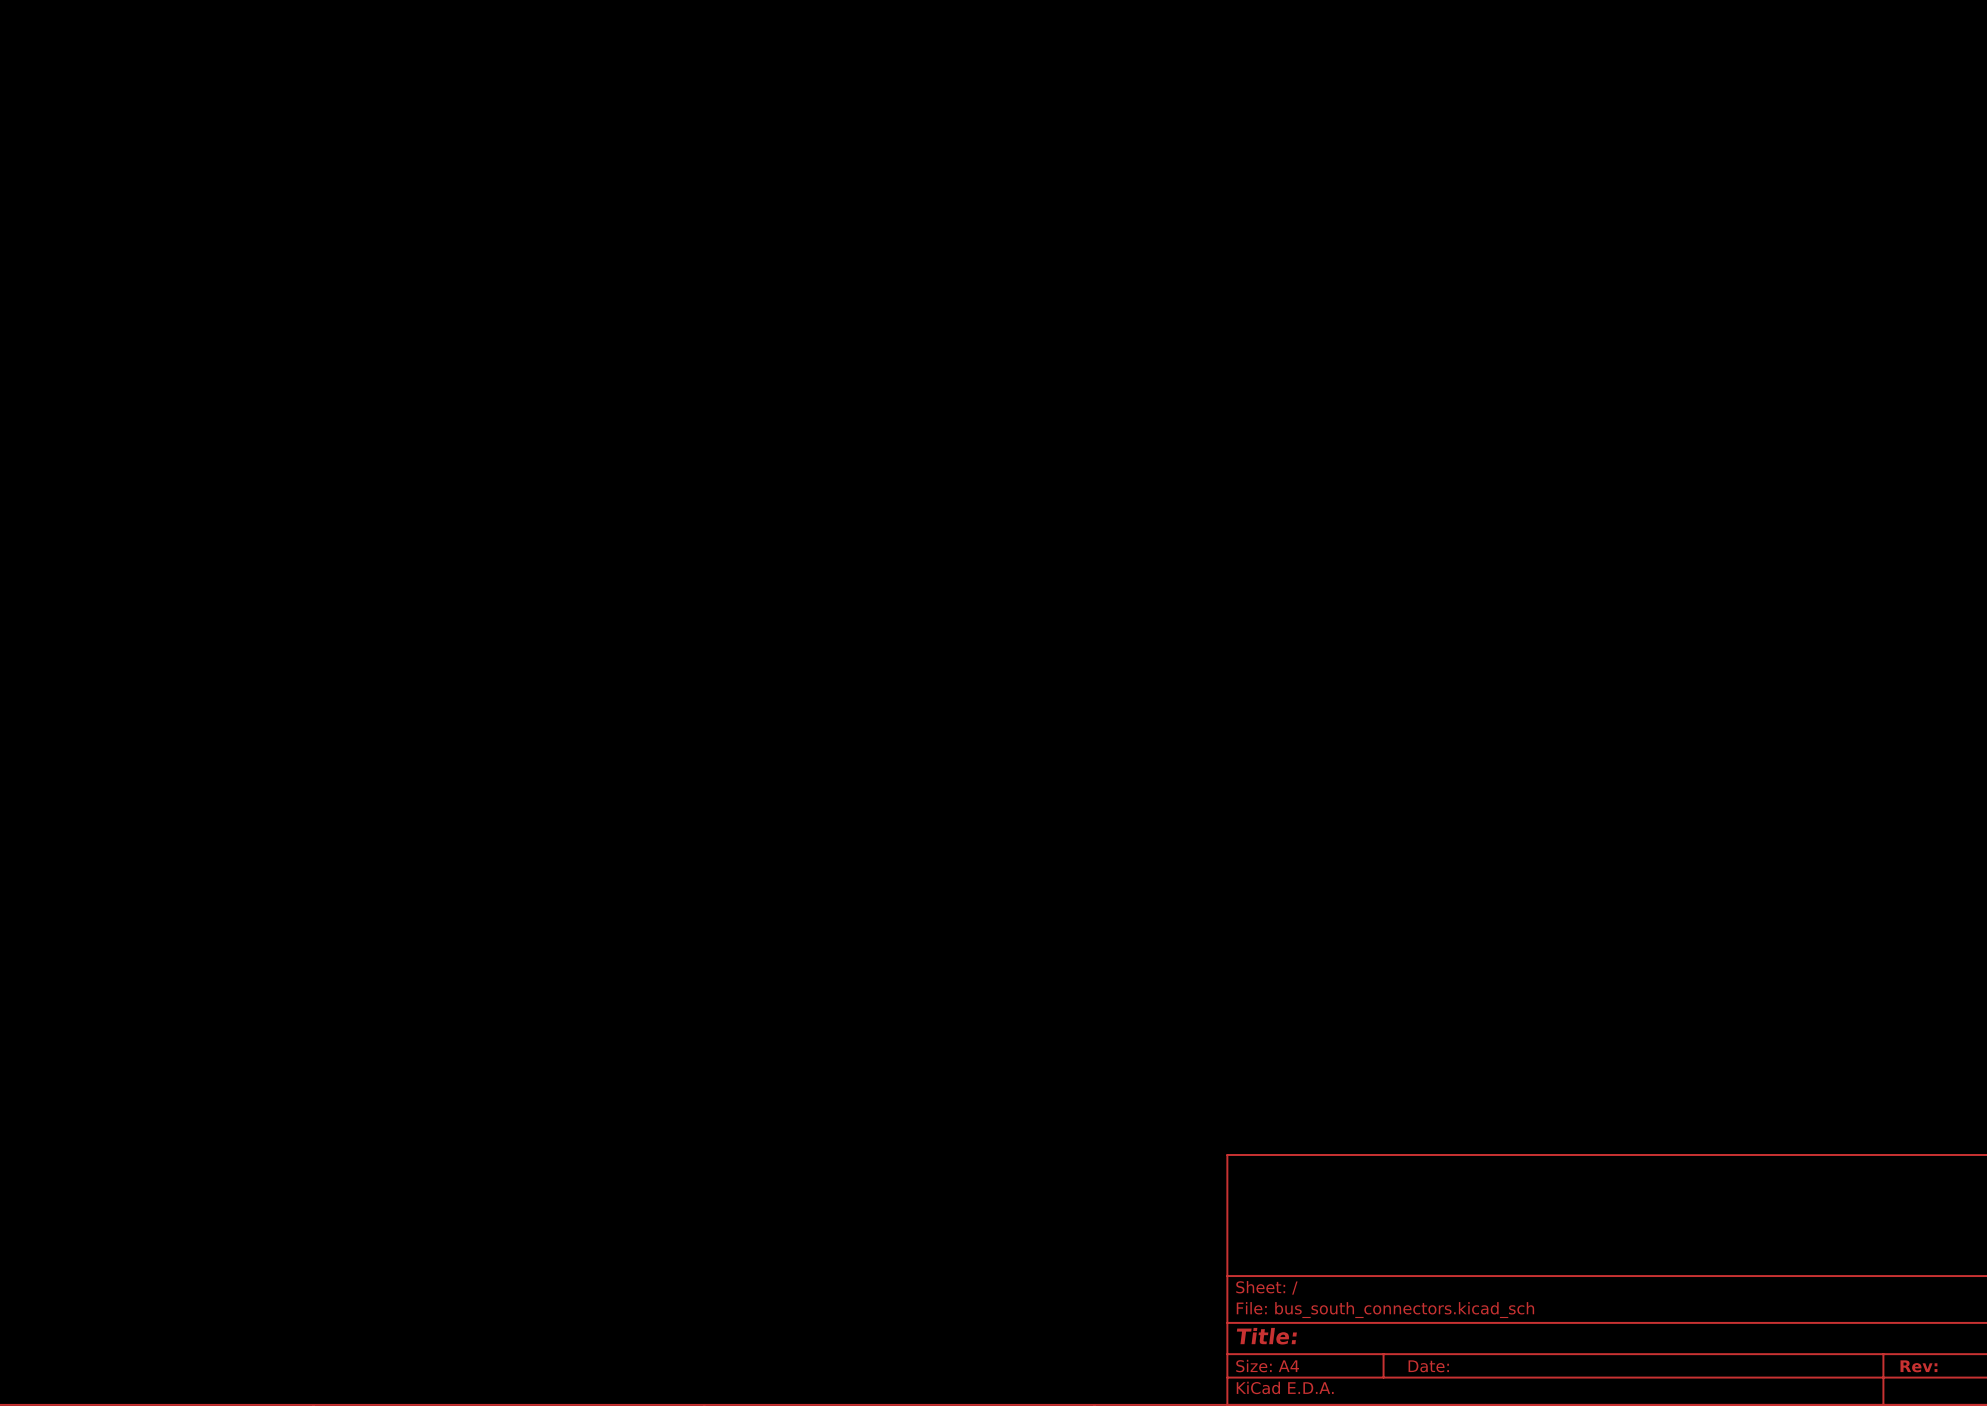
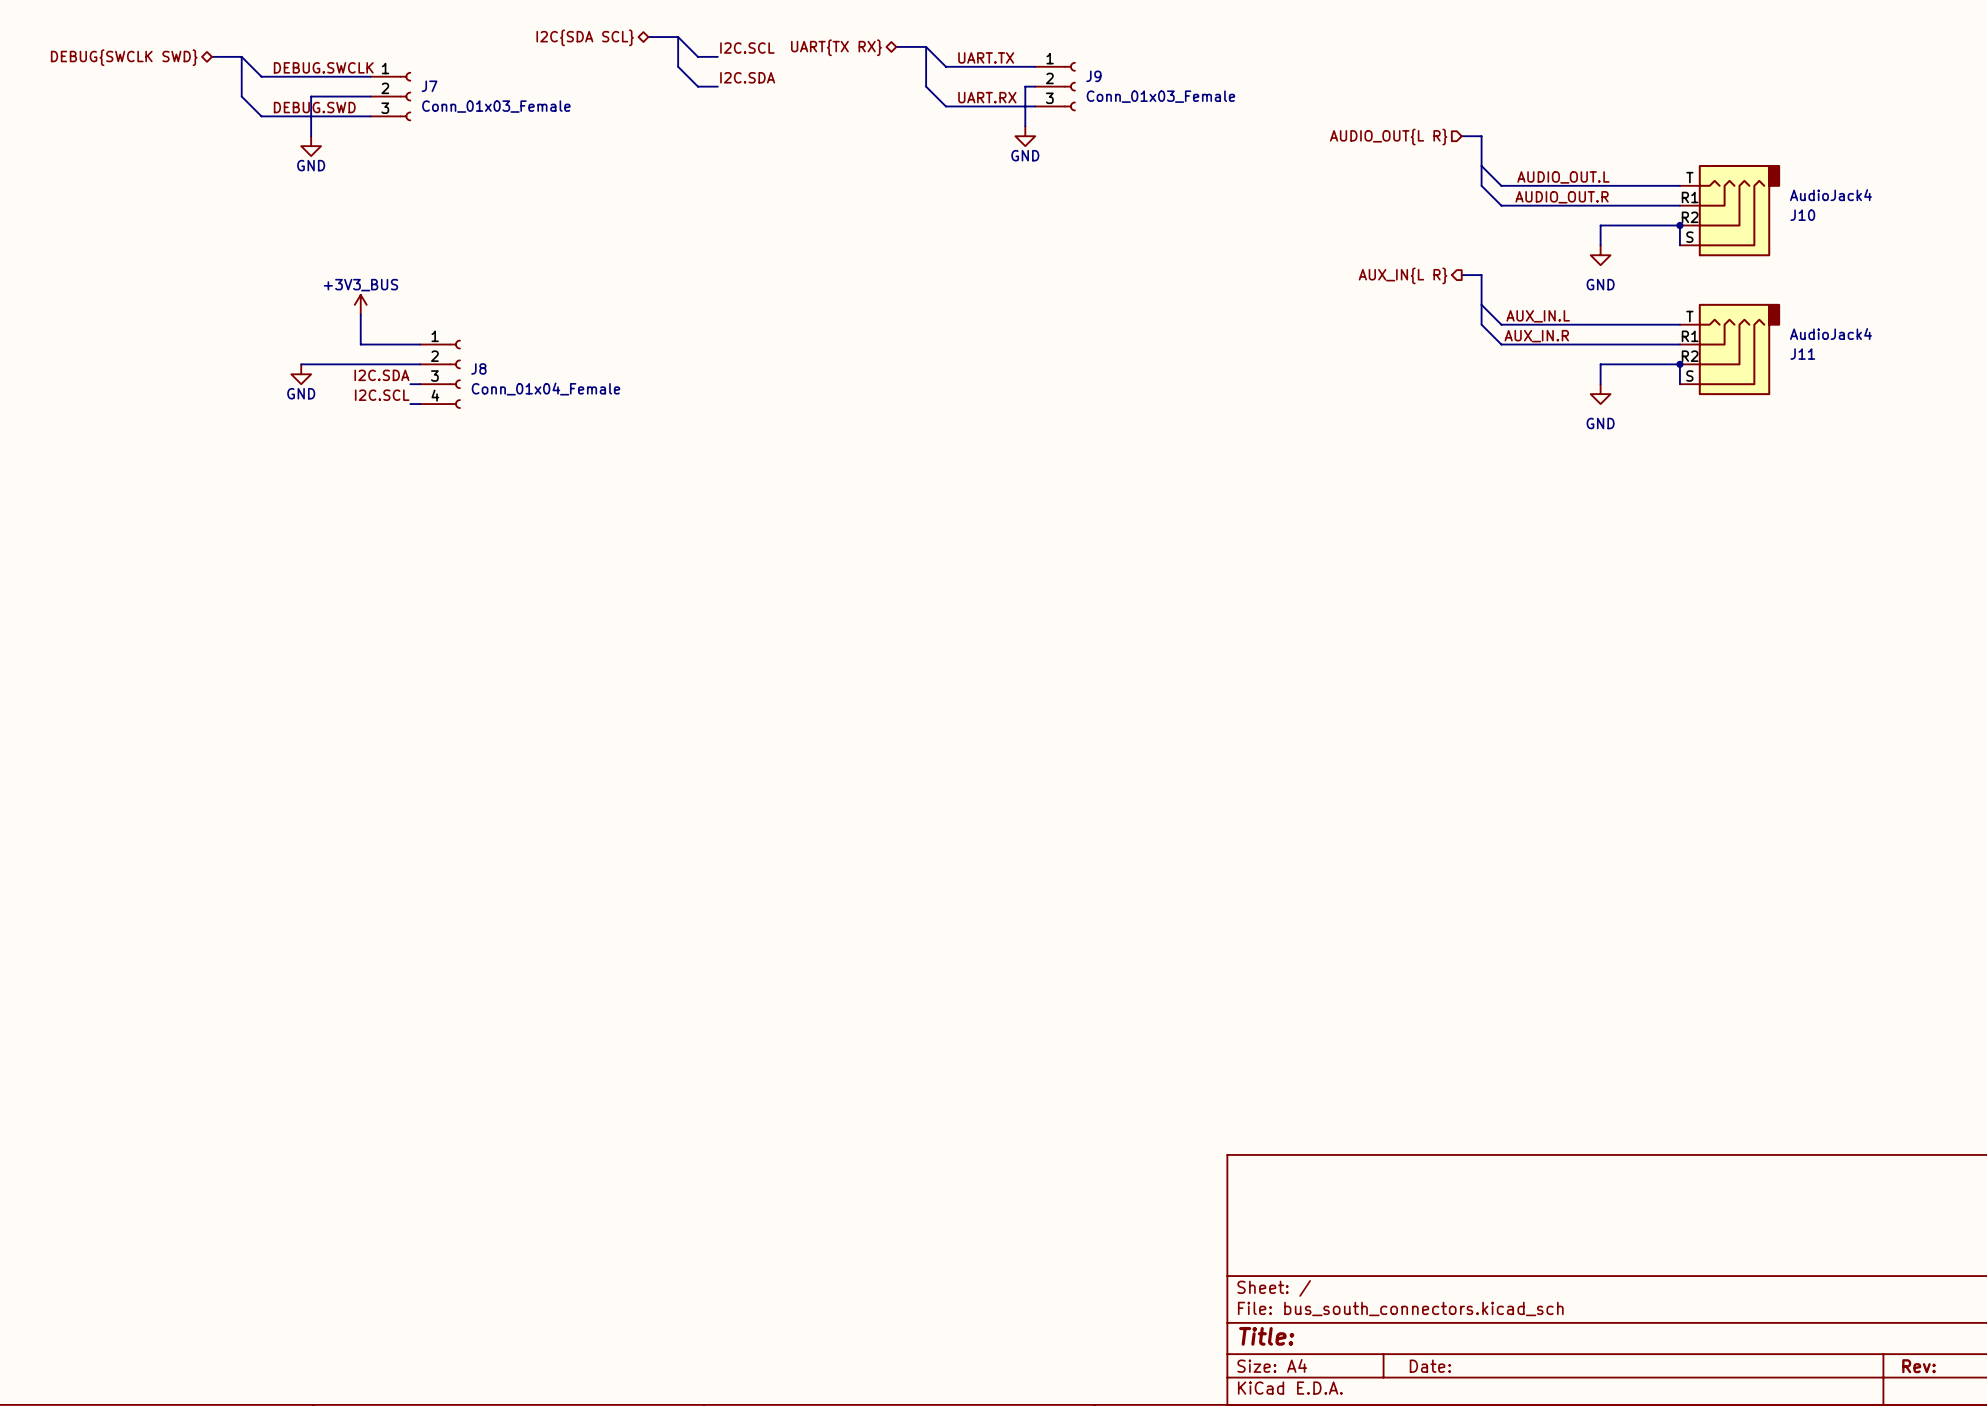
hierarchical label: none -> I2C{SDA SCL} (585, 37)
bus: none -> (648, 37) (678, 37) (678, 66)
wire: none -> (678, 37) (697, 56) (717, 56)
bus: none -> (896, 46) (926, 46) (926, 86)
wire: none -> (926, 46) (945, 66) (1035, 66)
hierarchical label: none -> UART{TX RX} (836, 47)
label: none -> I2C.SCL (747, 48)
bus: none -> (211, 56) (241, 56) (241, 96)
wire: none -> (241, 56) (261, 76) (370, 76)
hierarchical label: none -> DEBUG{SWCLK SWD} (124, 57)
label: none -> UART.TX (986, 57)
wire: none -> (678, 66) (697, 86) (717, 86)
label: none -> DEBUG.SWCLK (323, 67)
label: none -> I2C.SDA (747, 77)
wire: none -> (926, 86) (945, 106) (1035, 106)
wire: none -> (1035, 86) (1025, 86) (1025, 126)
J9: none -> Conn_01x03_Female (1055, 86)
wire: none -> (241, 96) (261, 116) (370, 116)
wire: none -> (370, 96) (311, 96) (311, 136)
J7: none -> Conn_01x03_Female (390, 96)
label: none -> UART.RX (987, 97)
label: none -> DEBUG.SWD (314, 107)
power symbol: none -> GND (1025, 136)
bus: none -> (1461, 136) (1481, 136) (1481, 185)
hierarchical label: none -> AUDIO_OUT{L R} (1388, 137)
power symbol: none -> GND (311, 146)
wire: none -> (1481, 165) (1501, 185) (1679, 185)
label: none -> AUDIO_OUT.L (1563, 177)
wire: none -> (1481, 185) (1501, 205) (1679, 205)
label: none -> AUDIO_OUT.R (1562, 197)
J10: none -> AudioJack4 (1730, 210)
junction: none -> (1679, 225)
wire: none -> (1600, 245) (1600, 225) (1679, 225) (1679, 245)
power symbol: none -> GND (1600, 255)
bus: none -> (1461, 275) (1481, 275) (1481, 324)
hierarchical label: none -> AUX_IN{L R} (1403, 275)
power symbol: none -> +3V3_BUS (360, 304)
wire: none -> (1481, 304) (1501, 324) (1679, 324)
wire: none -> (360, 314) (360, 344) (420, 344)
label: none -> AUX_IN.L (1538, 316)
wire: none -> (1481, 324) (1501, 344) (1679, 344)
label: none -> AUX_IN.R (1536, 336)
J11: none -> AudioJack4 (1730, 349)
wire: none -> (301, 364) (420, 364)
junction: none -> (1679, 364)
power symbol: none -> GND (301, 374)
J8: none -> Conn_01x04_Female (440, 374)
label: none -> I2C.SDA (381, 375)
wire: none -> (410, 384) (420, 384)
wire: none -> (1600, 384) (1600, 364) (1679, 364) (1679, 384)
power symbol: none -> GND (1600, 394)
label: none -> I2C.SCL (382, 395)
wire: none -> (410, 404) (420, 404)

